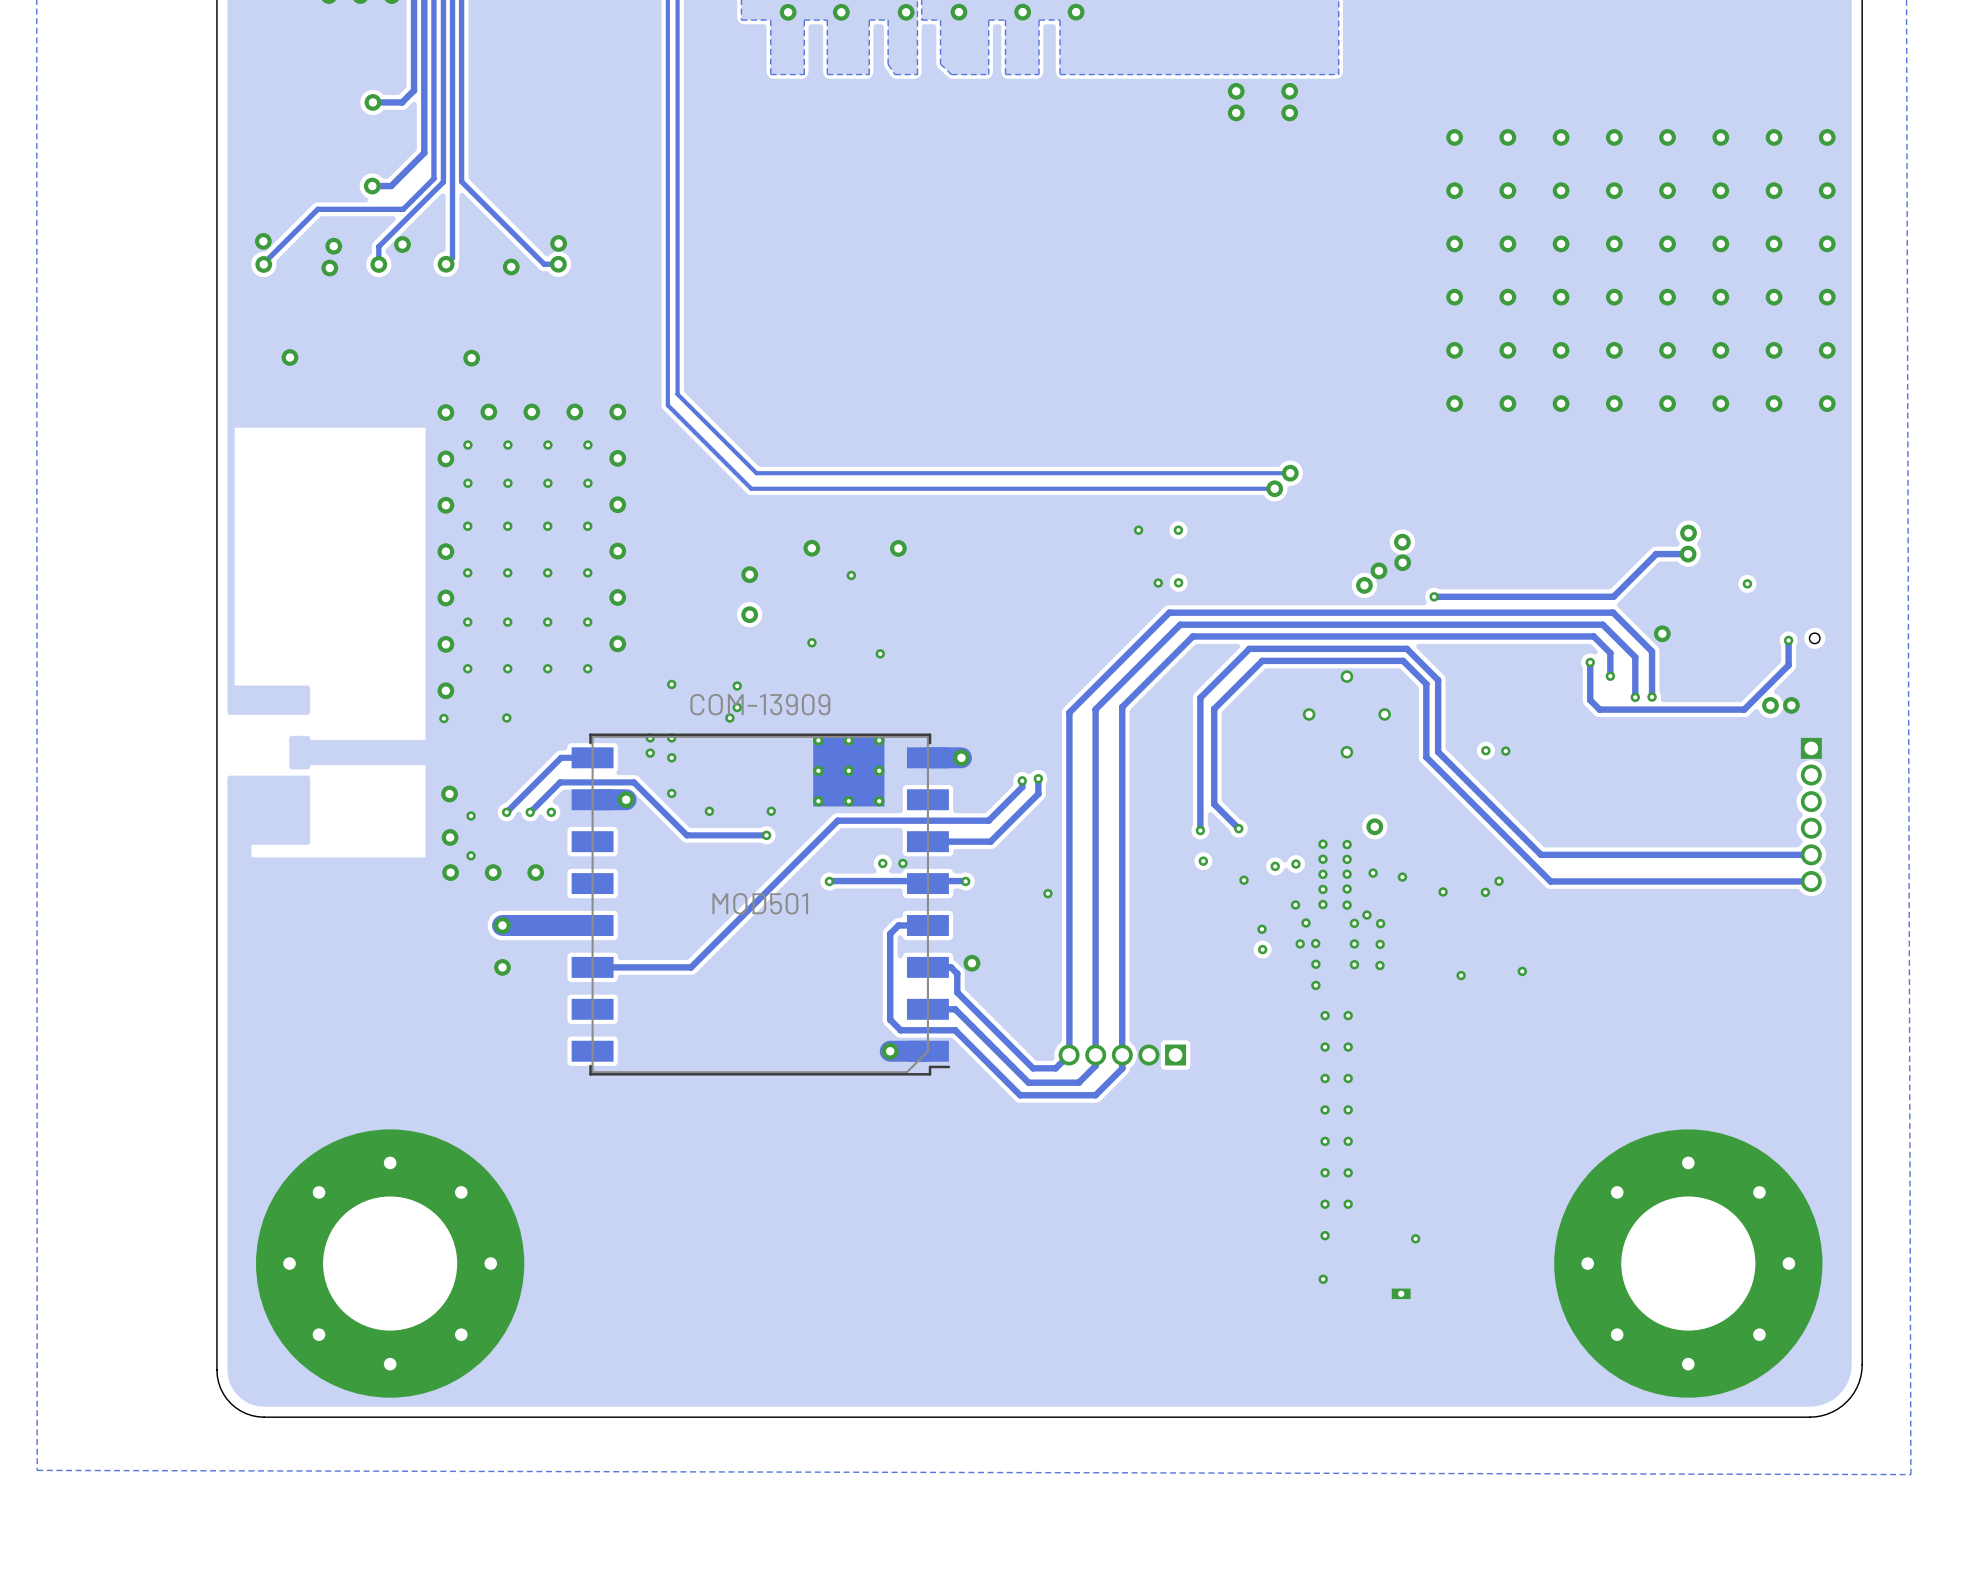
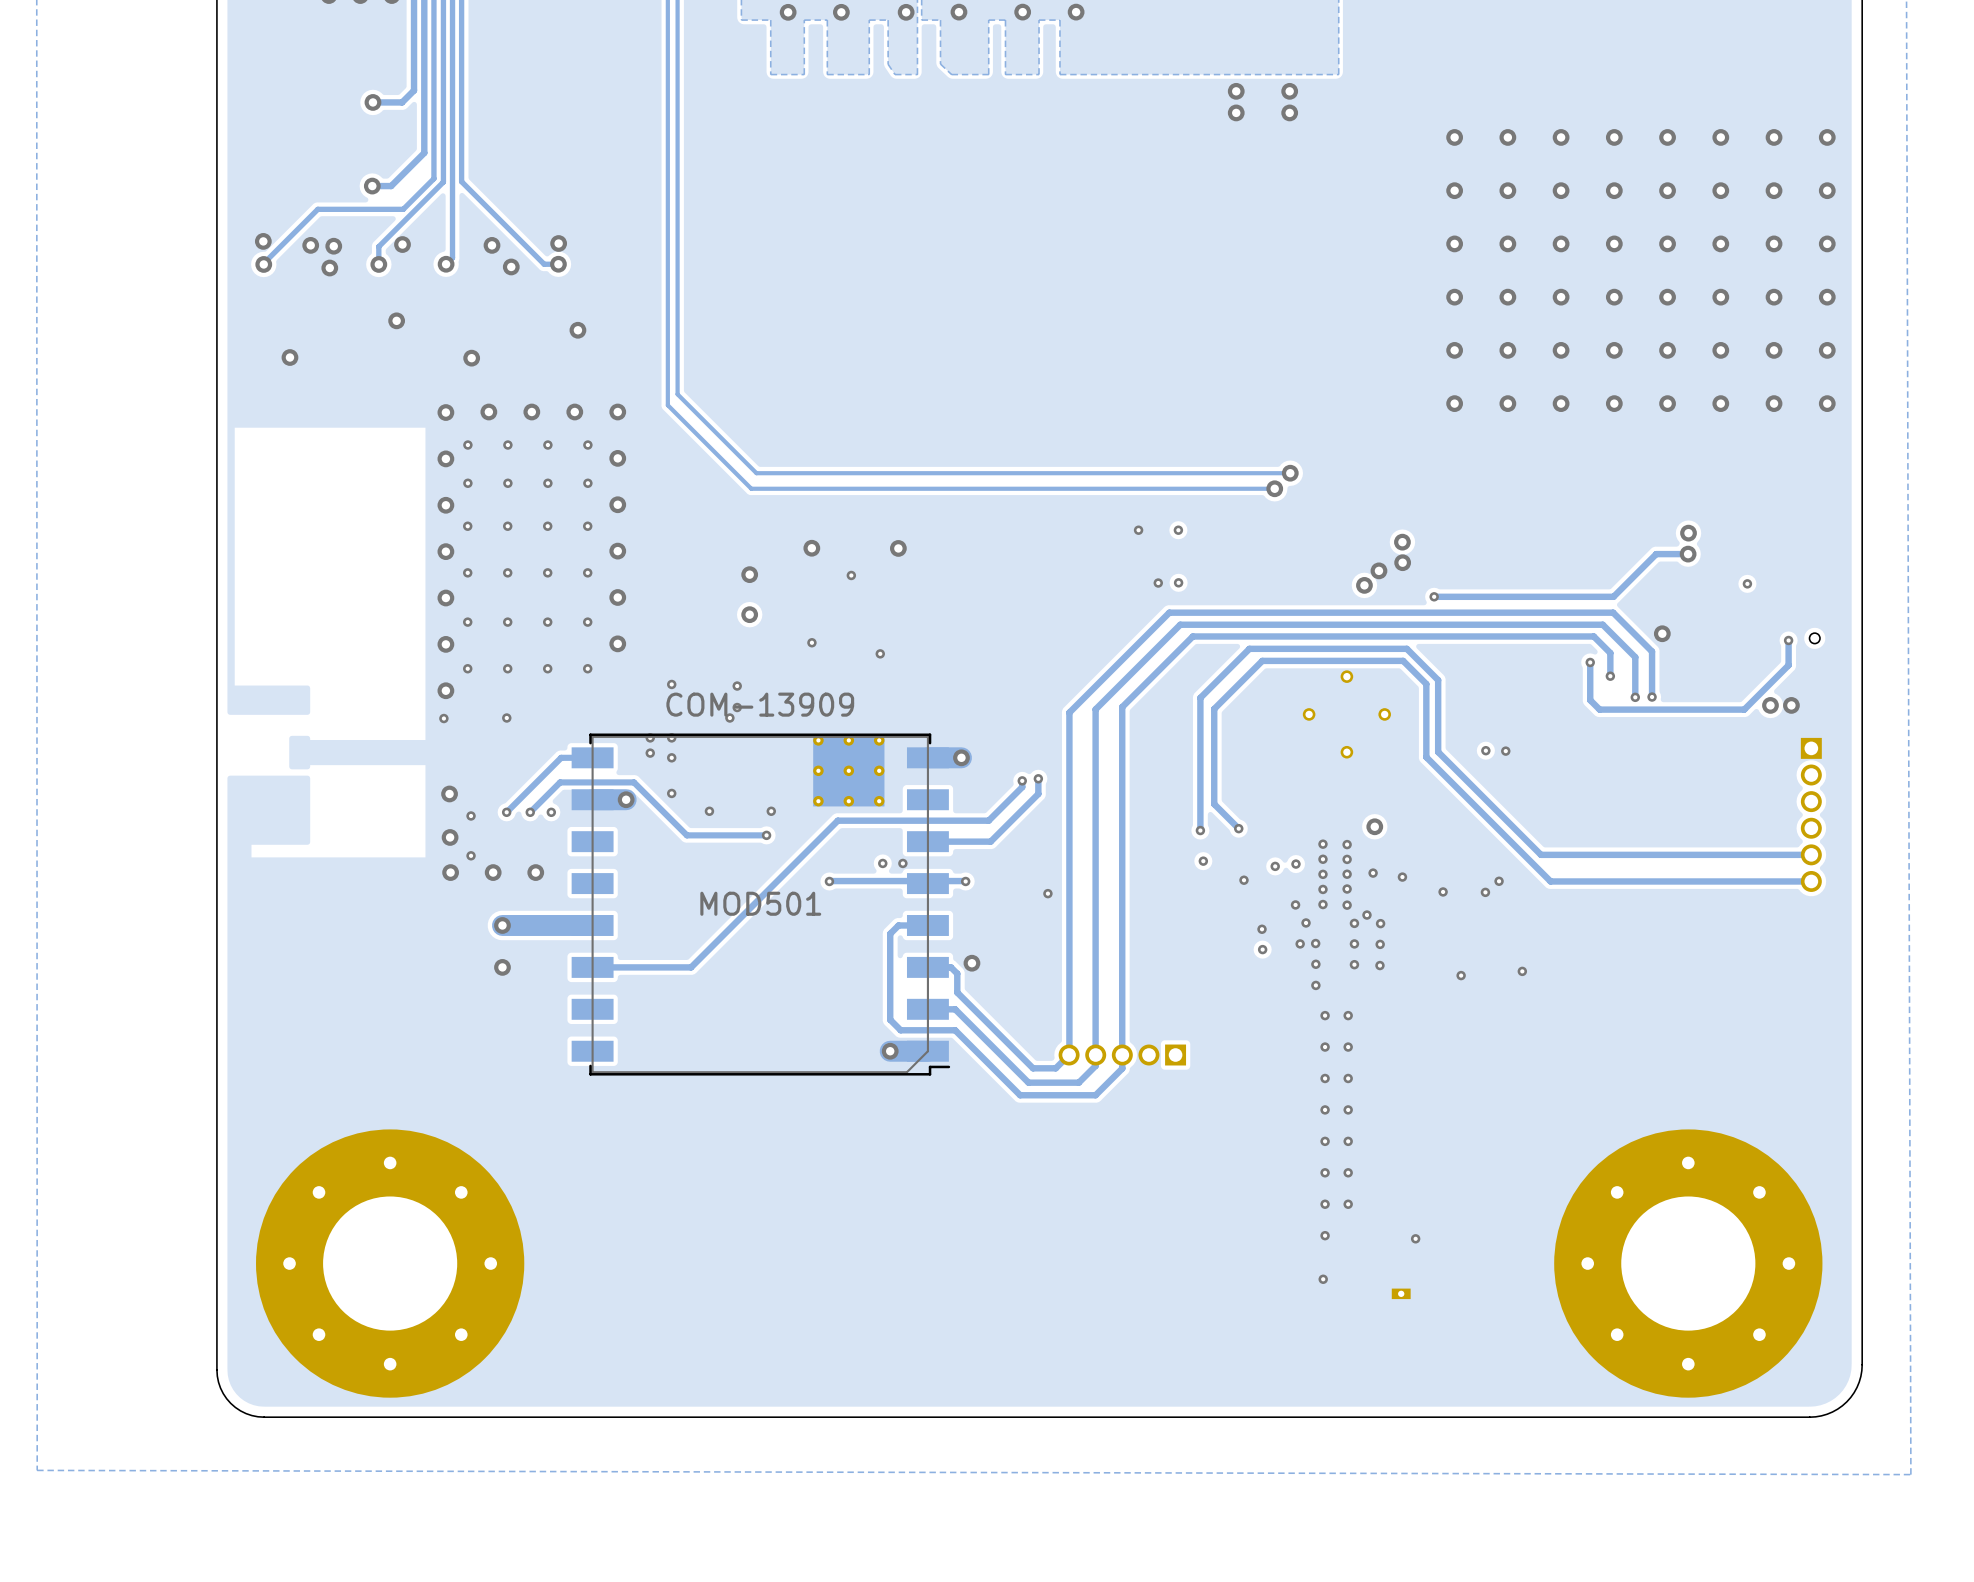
via: none -> (310, 245)
via: none -> (492, 245)
via: none -> (396, 320)
via: none -> (577, 330)

